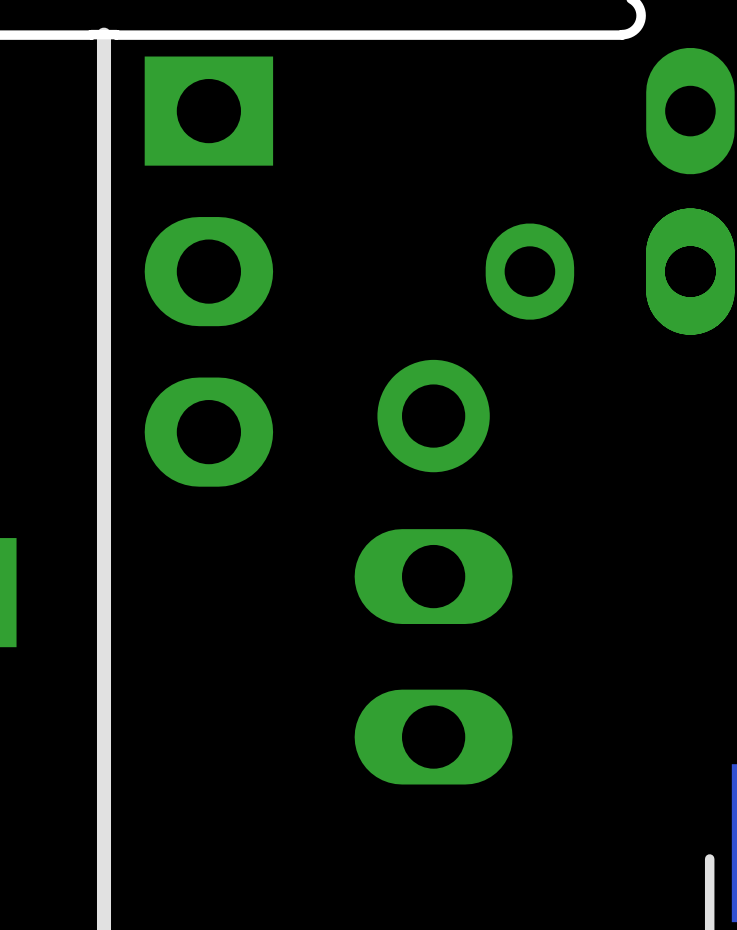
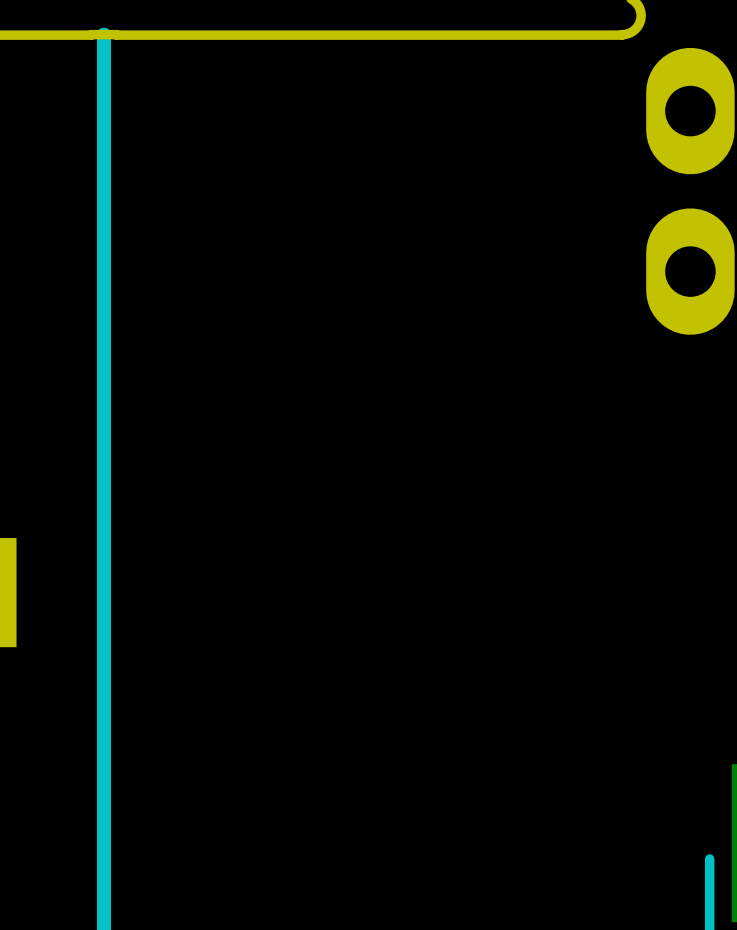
part: (208, 271) -> none
part: (610, 271) -> none
part: (433, 572) -> none

